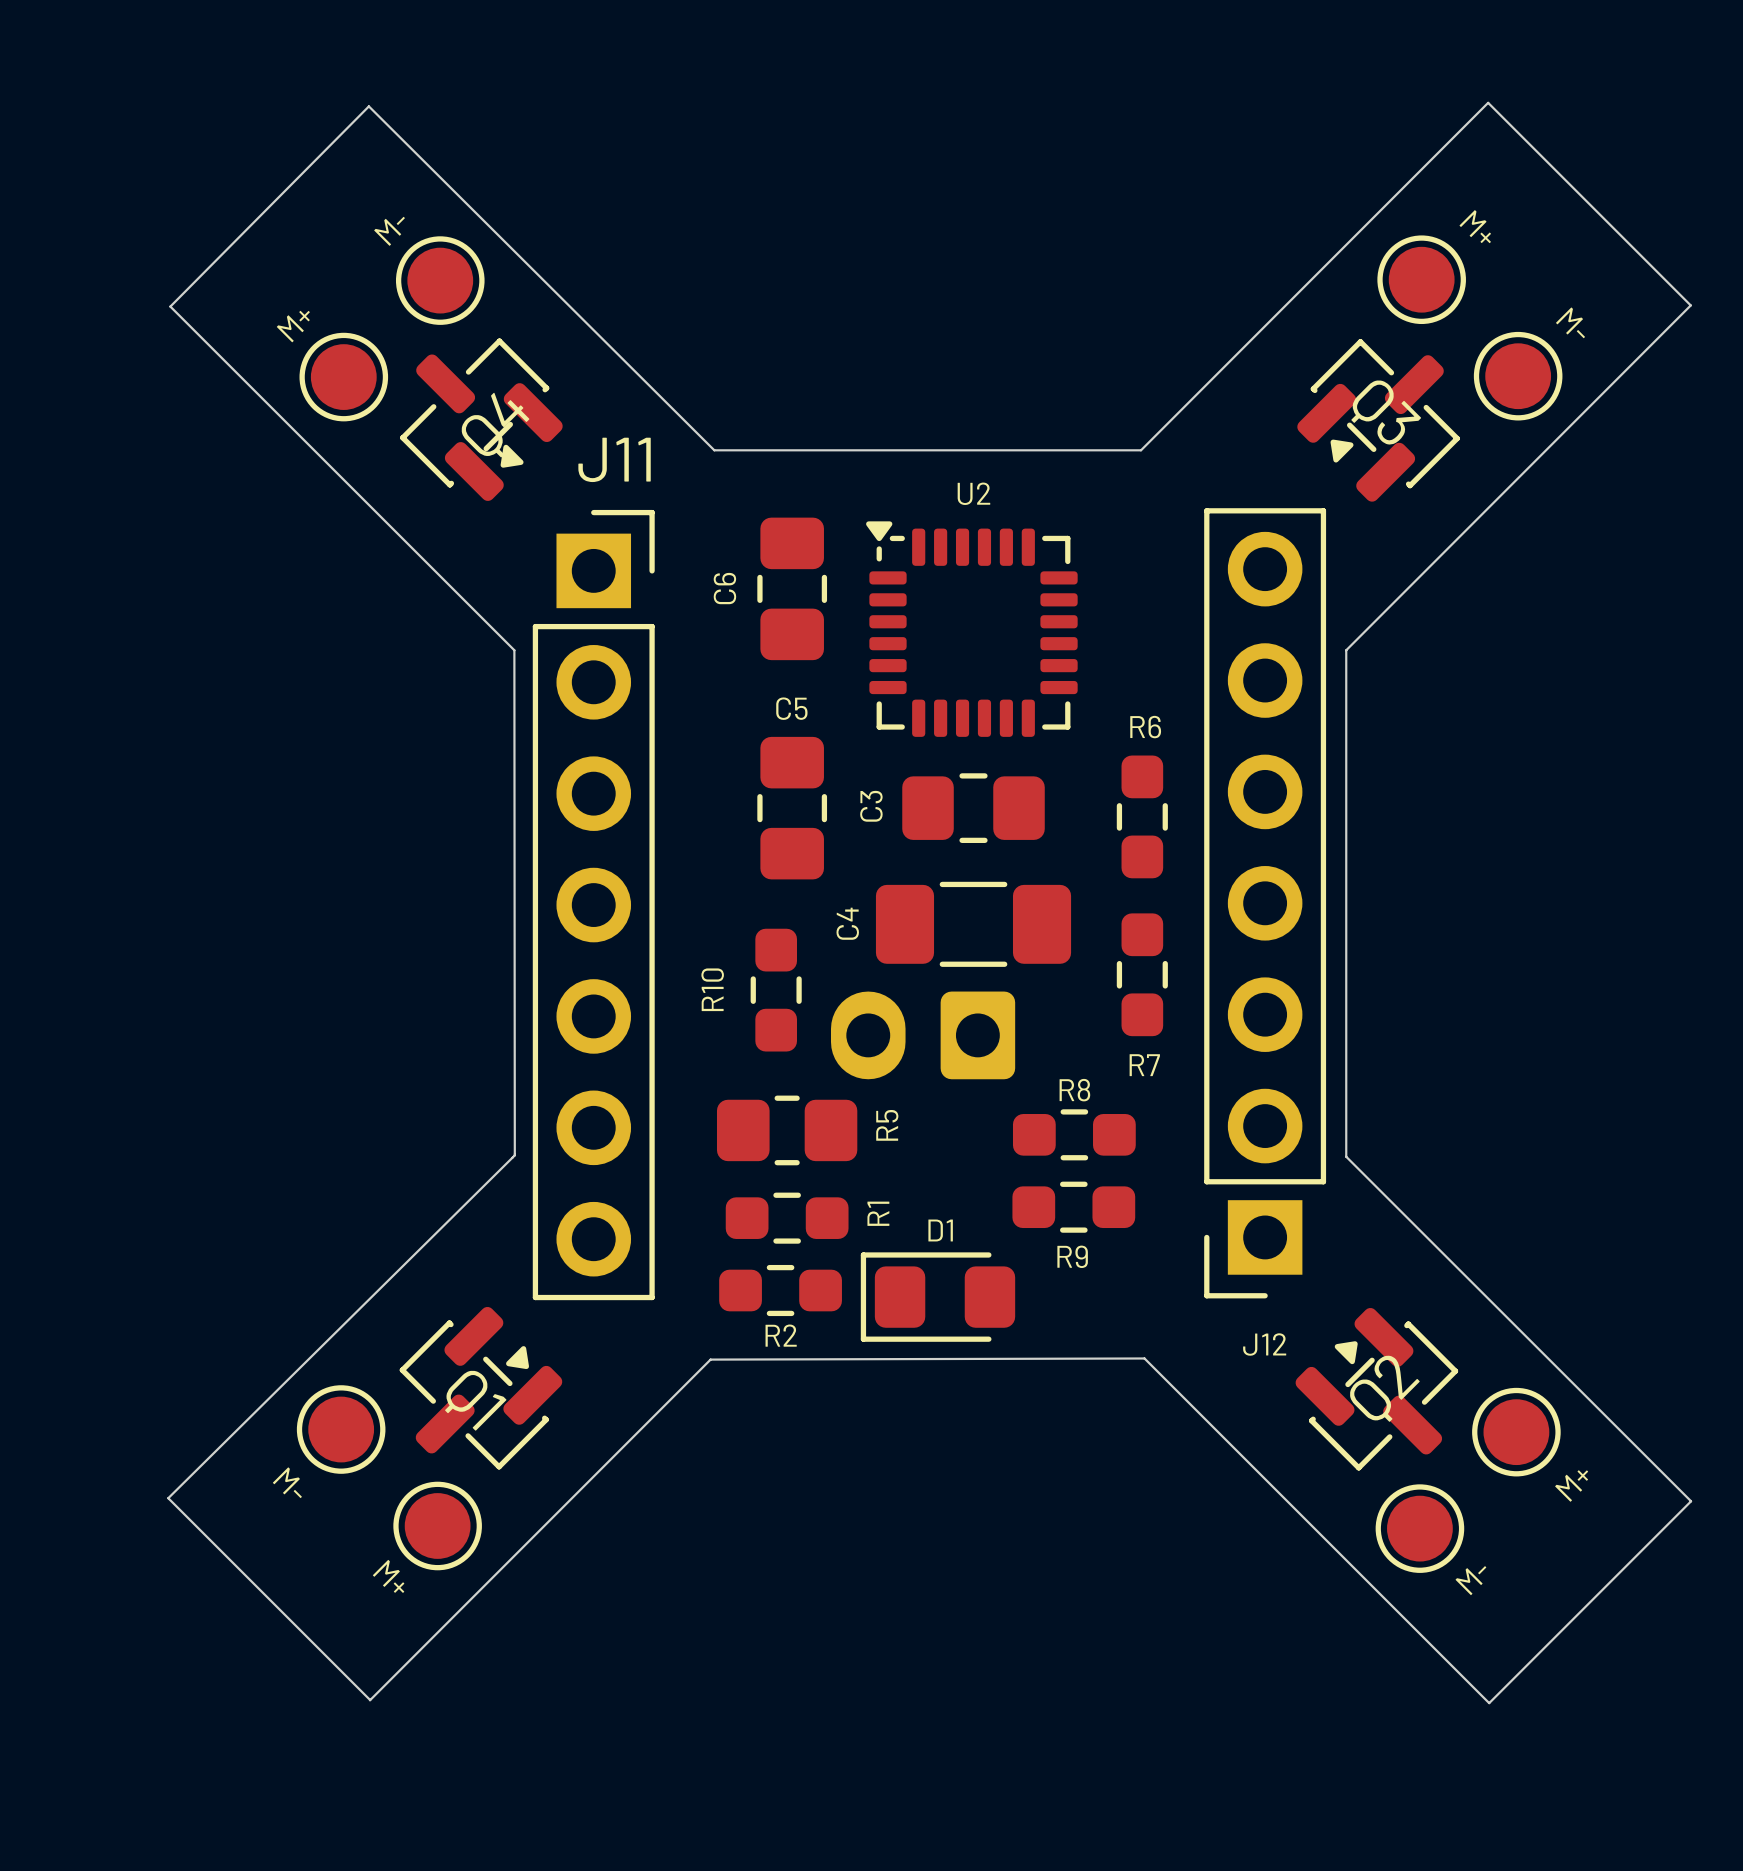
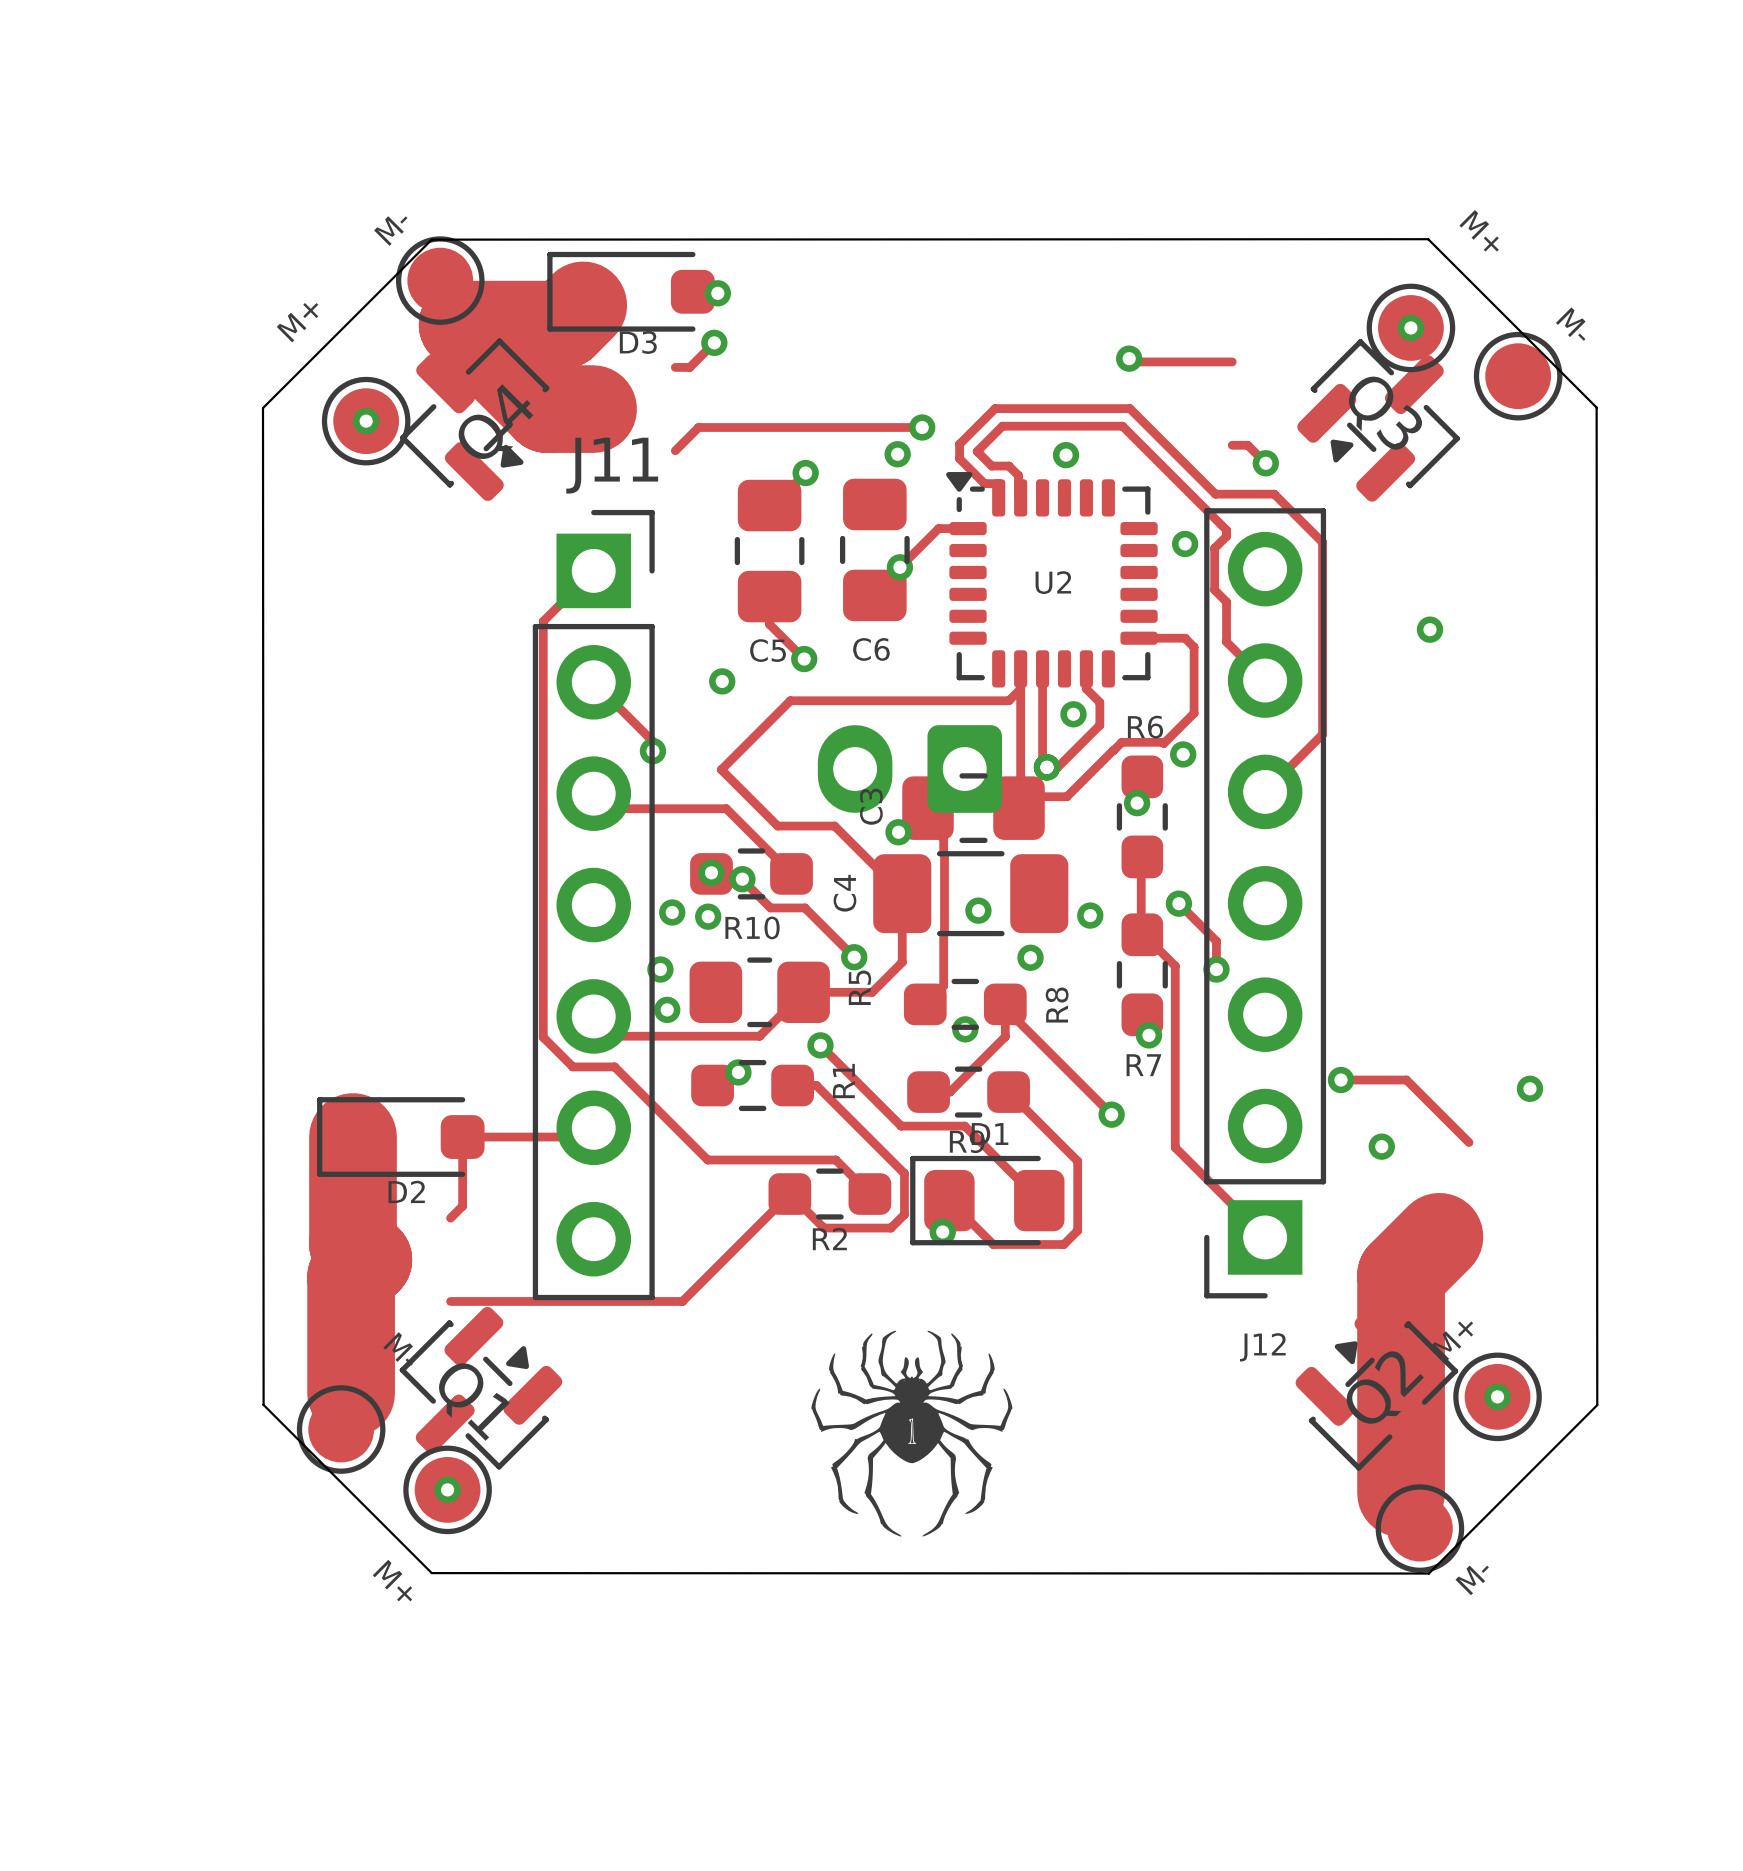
part position: (1421, 279) -> (1410, 327)
D3: none -> (631, 291)
via: none -> (717, 293)
track: none -> (583, 305) (563, 324) (462, 324) (547, 409) (593, 409)
via: none -> (1410, 327)
track: none -> (714, 342) (689, 367) (675, 367)
via: none -> (714, 342)
track: none -> (1129, 358) (1132, 361) (1232, 361)
via: none -> (1129, 358)
part position: (343, 377) -> (366, 421)
via: none -> (366, 421)
track: none -> (922, 427) (698, 427) (675, 450)
via: none -> (922, 427)
track: none -> (1232, 445) (1247, 445) (1265, 463)
via: none -> (897, 454)
via: none -> (1066, 455)
via: none -> (1265, 463)
via: none -> (805, 473)
U2 name position: U2 (973, 493) -> U2 (1053, 582)
track: none -> (998, 497) (998, 483) (984, 483) (959, 458) (959, 444) (995, 408) (1129, 408) (1215, 494) (1274, 494) (1322, 542) (1322, 734) (1265, 791)
track: none -> (1020, 497) (1018, 495) (1018, 475) (1008, 466) (991, 466) (977, 451) (1002, 426) (1122, 426) (1226, 530) (1226, 536) (1214, 548) (1214, 590) (1226, 601) (1226, 641) (1265, 680)
track: none -> (968, 528) (938, 528) (874, 592) (874, 595)
via: none -> (1185, 543)
via: none -> (899, 567)
track: none -> (593, 570) (543, 621) (543, 1037) (572, 1066) (614, 1066) (707, 1160) (835, 1160) (869, 1194)
C6 name rotation: 0° (724, 588) -> 90° clockwise (871, 649)
C6 name position: C6 (724, 588) -> C6 (871, 649)
C6 position: (792, 588) -> (874, 549)
track: none -> (769, 596) (769, 624) (804, 659)
U2 position: (971, 629) -> (1051, 579)
via: none -> (1430, 629)
track: none -> (1139, 638) (1185, 638) (1194, 647) (1194, 713) (1163, 743) (1121, 742) (1113, 750)
via: none -> (804, 659)
track: none -> (1020, 668) (1020, 789) (1027, 796) (1066, 796) (1112, 750)
track: none -> (1042, 668) (1042, 762) (1046, 767) (1057, 767) (1099, 725) (1099, 702) (1086, 689) (1086, 668)
via: none -> (722, 681)
track: none -> (593, 682) (652, 741) (652, 751)
track: none -> (1020, 689) (1008, 700) (790, 700) (721, 769) (777, 826) (834, 826) (902, 893) (902, 962) (872, 992) (803, 992) (759, 1036) (613, 1036) (593, 1016)
C5 name position: C5 (791, 708) -> C5 (768, 650)
via: none -> (1073, 714)
via: none -> (652, 751)
via: none -> (1183, 754)
via: none -> (1046, 767)
part: none -> (909, 769)
track: none -> (593, 793) (608, 808) (726, 808) (791, 873)
via: none -> (1137, 803)
C5 position: (792, 808) -> (769, 551)
track: none -> (898, 832) (937, 832) (943, 838) (943, 985) (925, 1004)
via: none -> (898, 832)
track: none -> (1142, 856) (1141, 932) (1175, 966) (1175, 1147) (1265, 1237)
via: none -> (711, 872)
track: none -> (742, 879) (770, 907) (804, 907) (854, 957)
via: none -> (742, 879)
track: none -> (1178, 903) (1216, 941) (1216, 969)
via: none -> (1178, 903)
via: none -> (978, 910)
via: none -> (672, 912)
via: none -> (1090, 915)
via: none -> (708, 916)
C4 position: (973, 924) -> (970, 893)
via: none -> (854, 957)
via: none -> (1030, 957)
via: none -> (660, 969)
via: none -> (1216, 969)
R10 rotation: 0° (776, 990) -> 90° clockwise (751, 873)
R10 position: (776, 990) -> (751, 873)
track: none -> (1005, 1004) (1005, 1036) (949, 1092) (928, 1092)
track: none -> (1005, 1008) (1111, 1114)
via: none -> (667, 1009)
via: none -> (965, 1029)
part: (923, 1035) -> none
via: none -> (1148, 1035)
track: none -> (820, 1045) (901, 1126) (964, 1126) (1039, 1200)
via: none -> (820, 1045)
via: none -> (738, 1072)
track: none -> (1340, 1080) (1406, 1080) (1469, 1142)
via: none -> (1340, 1080)
track: none -> (792, 1085) (816, 1085) (904, 1173) (904, 1214) (890, 1228) (823, 1228) (789, 1194) (682, 1301) (450, 1301)
via: none -> (1529, 1088)
R8 name rotation: 0° (1074, 1090) -> 90° counterclockwise (1057, 1005)
R8 name position: R8 (1074, 1090) -> R8 (1057, 1005)
track: none -> (1008, 1092) (1077, 1161) (1077, 1230) (1063, 1244) (993, 1244) (949, 1200) (949, 1225) (942, 1231)
via: none -> (1111, 1114)
track: none -> (593, 1127) (584, 1137) (462, 1137) (462, 1206) (450, 1218)
R5 position: (787, 1130) -> (759, 992)
R8 position: (1074, 1134) -> (965, 1004)
track: none -> (353, 1137) (353, 1244) (368, 1259) (351, 1277) (351, 1393)
D2: none -> (400, 1137)
via: none -> (1381, 1146)
R9 position: (1073, 1207) -> (968, 1092)
R1 position: (787, 1218) -> (752, 1085)
via: none -> (942, 1231)
track: none -> (1439, 1236) (1401, 1275) (1401, 1493)
R2 position: (780, 1290) -> (829, 1194)
D1 position: (937, 1297) -> (987, 1200)
drawing: none -> [811, 1330, 1013, 1537]
via: none -> (1497, 1396)
part position: (1516, 1432) -> (1497, 1396)
text position: M- (287, 1482) -> M- (398, 1348)
text position: M+ (1571, 1486) -> M+ (1452, 1341)
via: none -> (447, 1489)
part position: (437, 1525) -> (447, 1489)
board edge: (370, 1700) (168, 1498) (514, 1155) (514, 650) (170, 306) (368, 106) (714, 450) (1141, 450) (1488, 102) (1690, 305) (1346, 650) (1346, 1156) (1691, 1501) (1489, 1703) (1144, 1358) (710, 1359) (369, 1700) -> (263, 1404) (263, 408) (431, 239) (1428, 239) (1596, 407) (1597, 1405) (1428, 1573) (431, 1573) (263, 1404)

